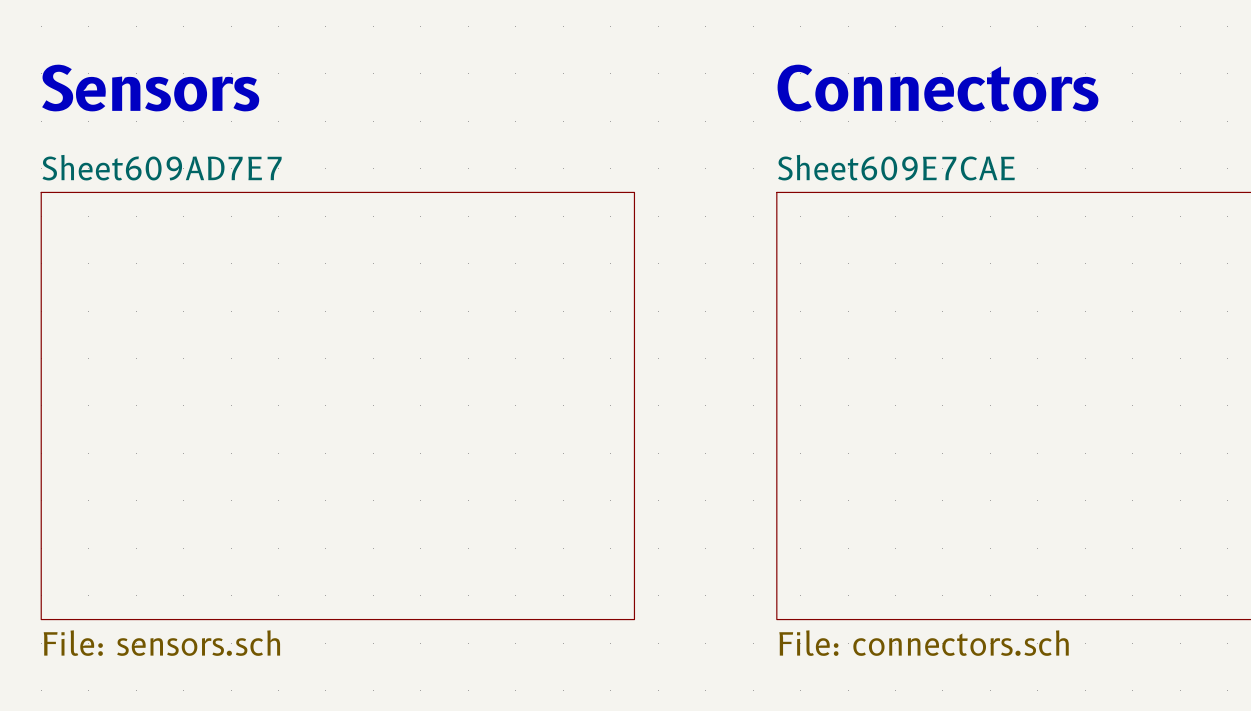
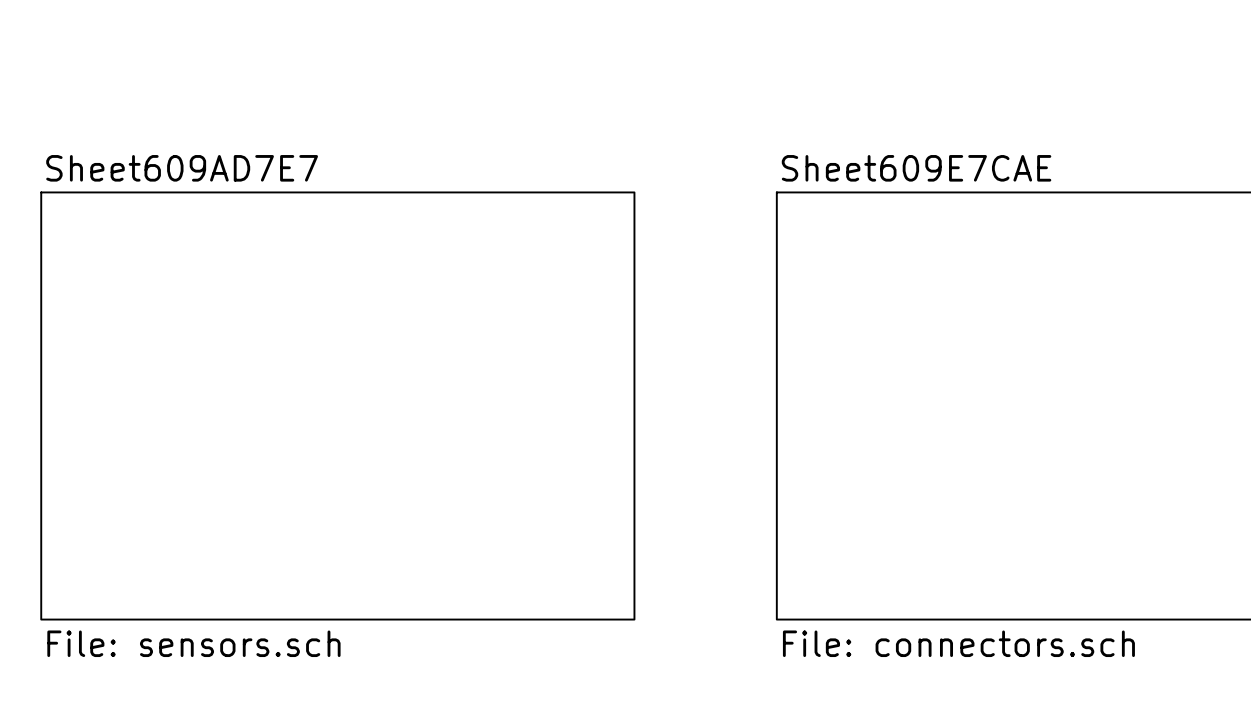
text: Sensors (150, 88) -> none
text: Connectors (937, 88) -> none

